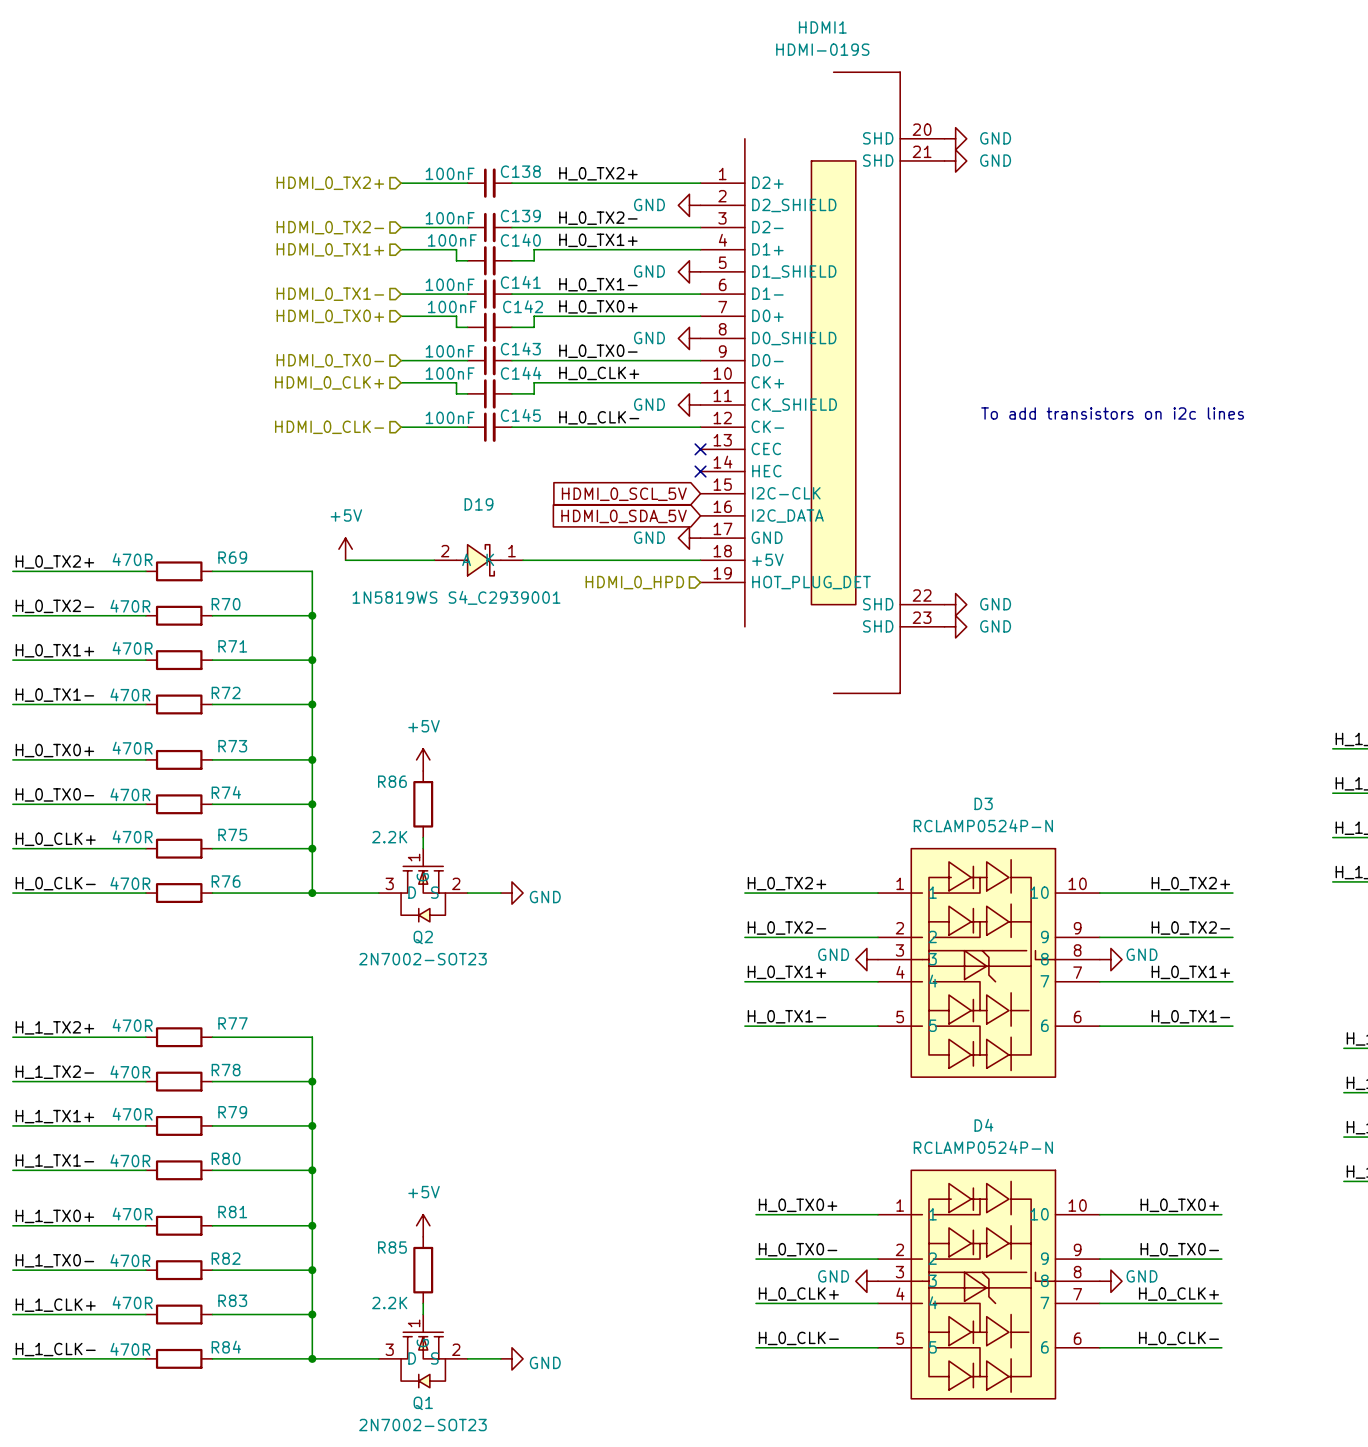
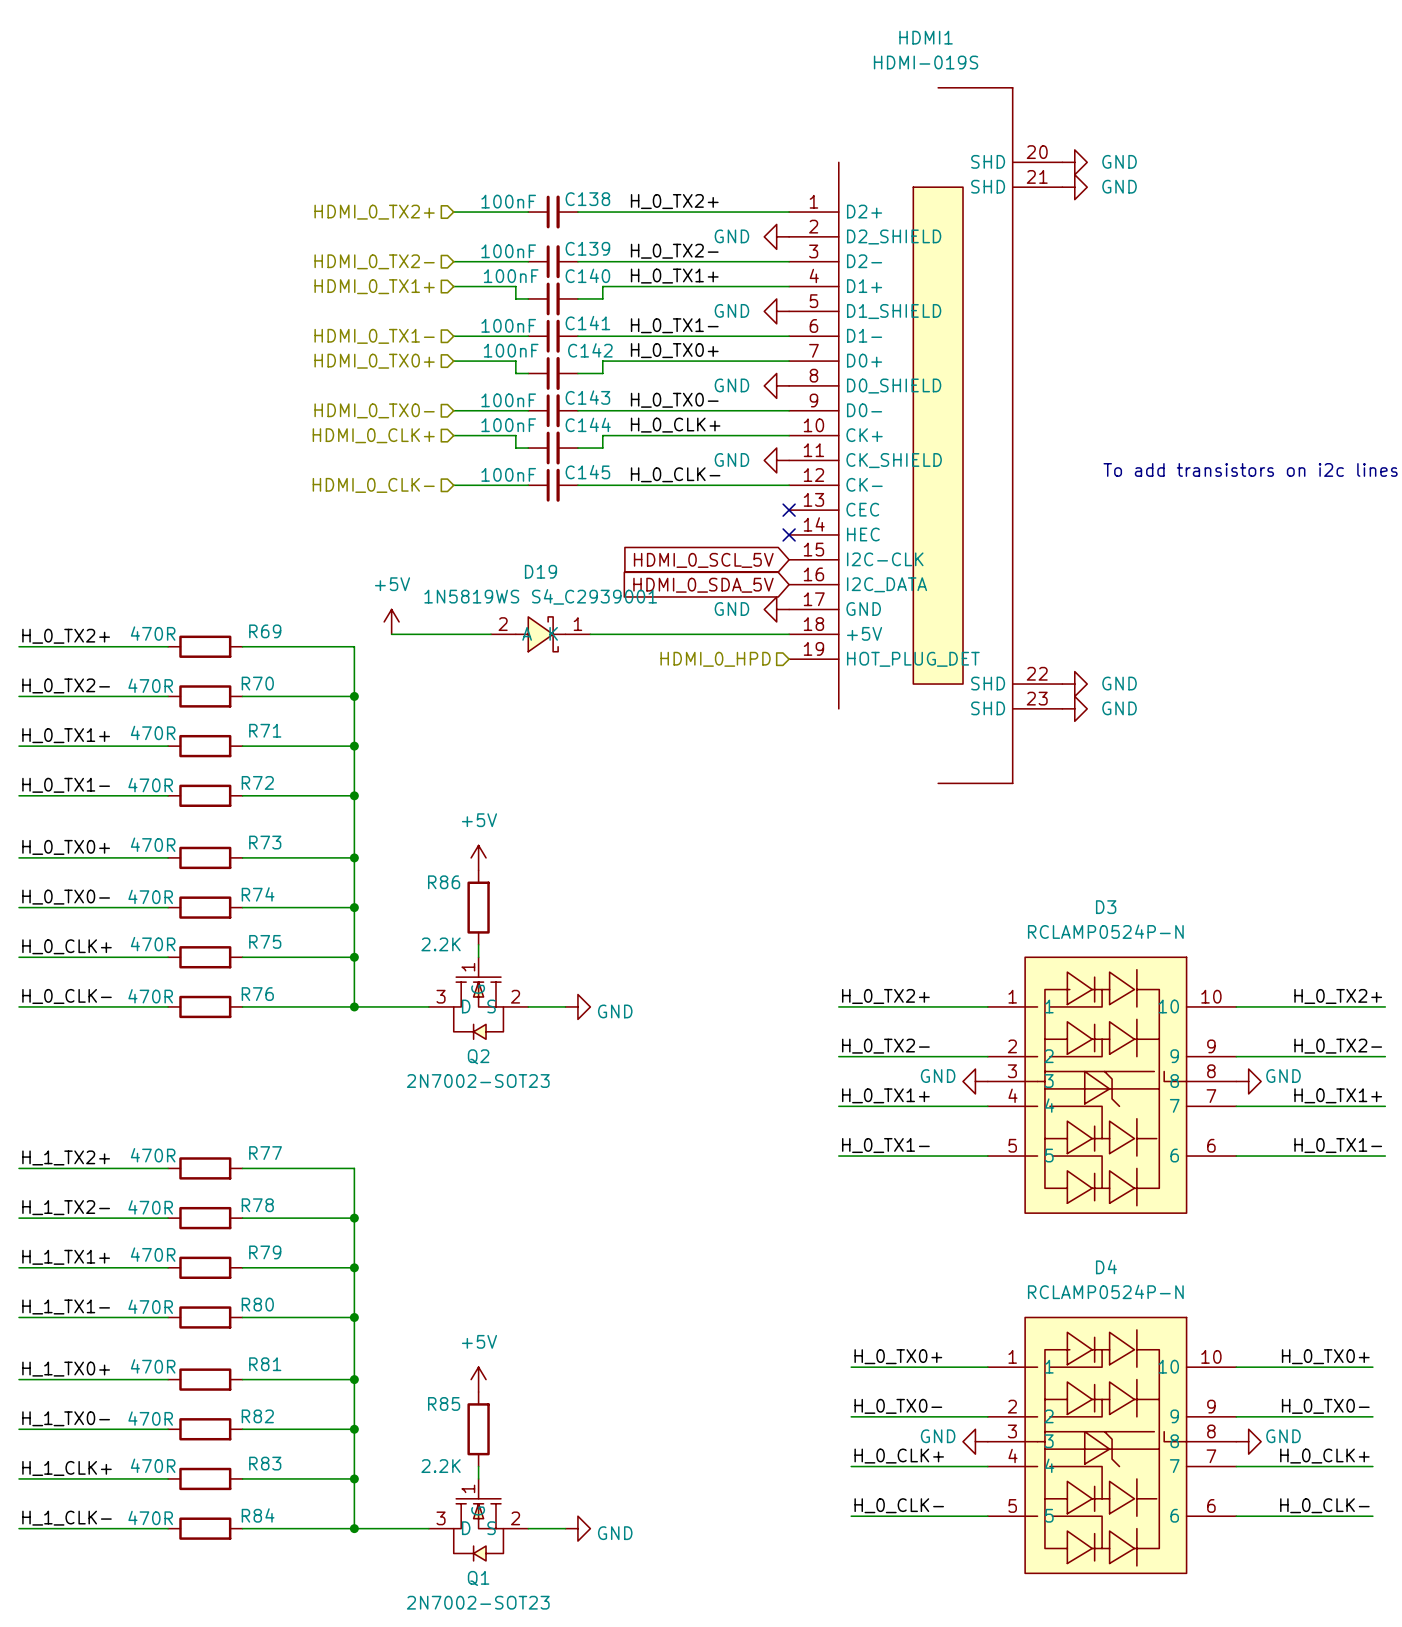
D19 value position: 1N5819WS S4_C2939001 (456, 597) -> 1N5819WS S4_C2939001 (540, 596)

